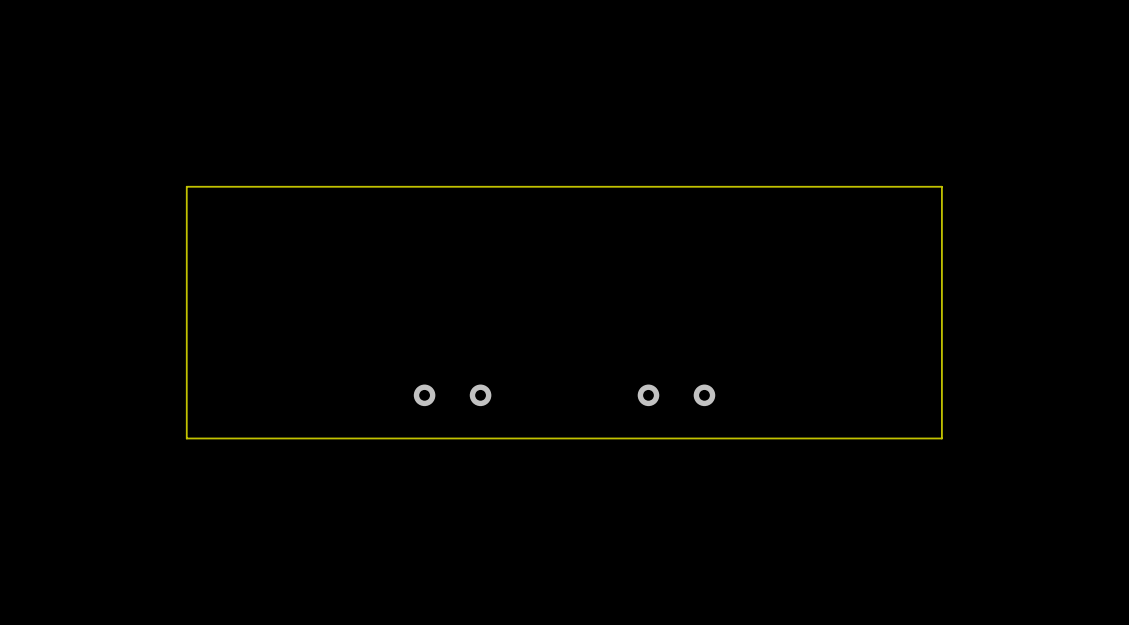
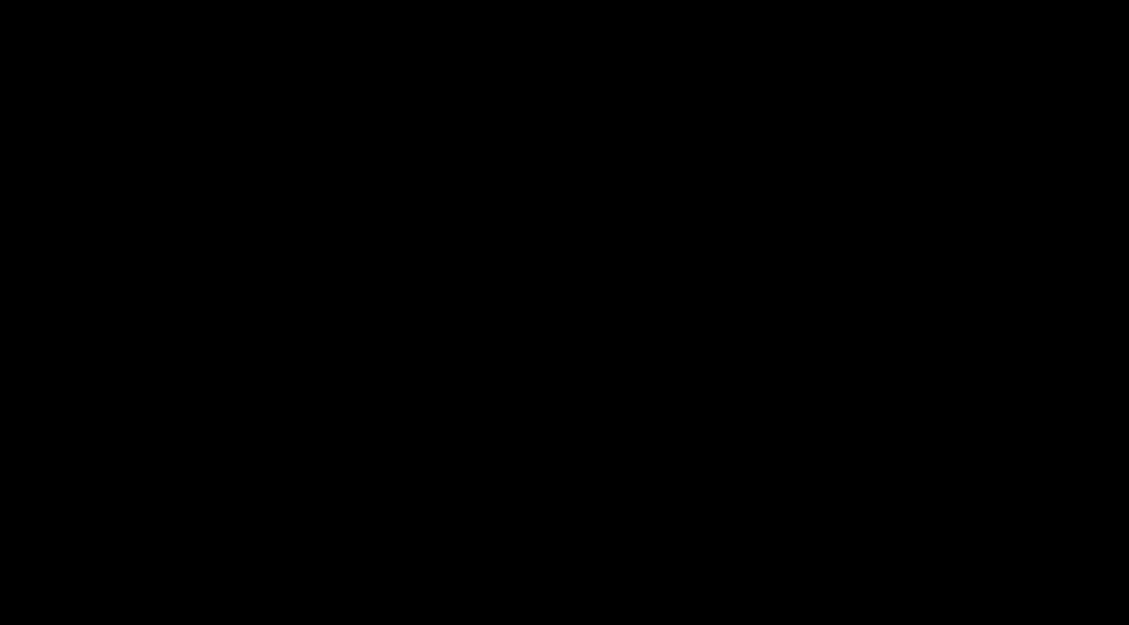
board edge: (941, 186) (186, 186) (186, 438) (941, 438) (941, 186) -> none
via: (424, 395) -> none
via: (480, 395) -> none
via: (648, 395) -> none
via: (704, 395) -> none

